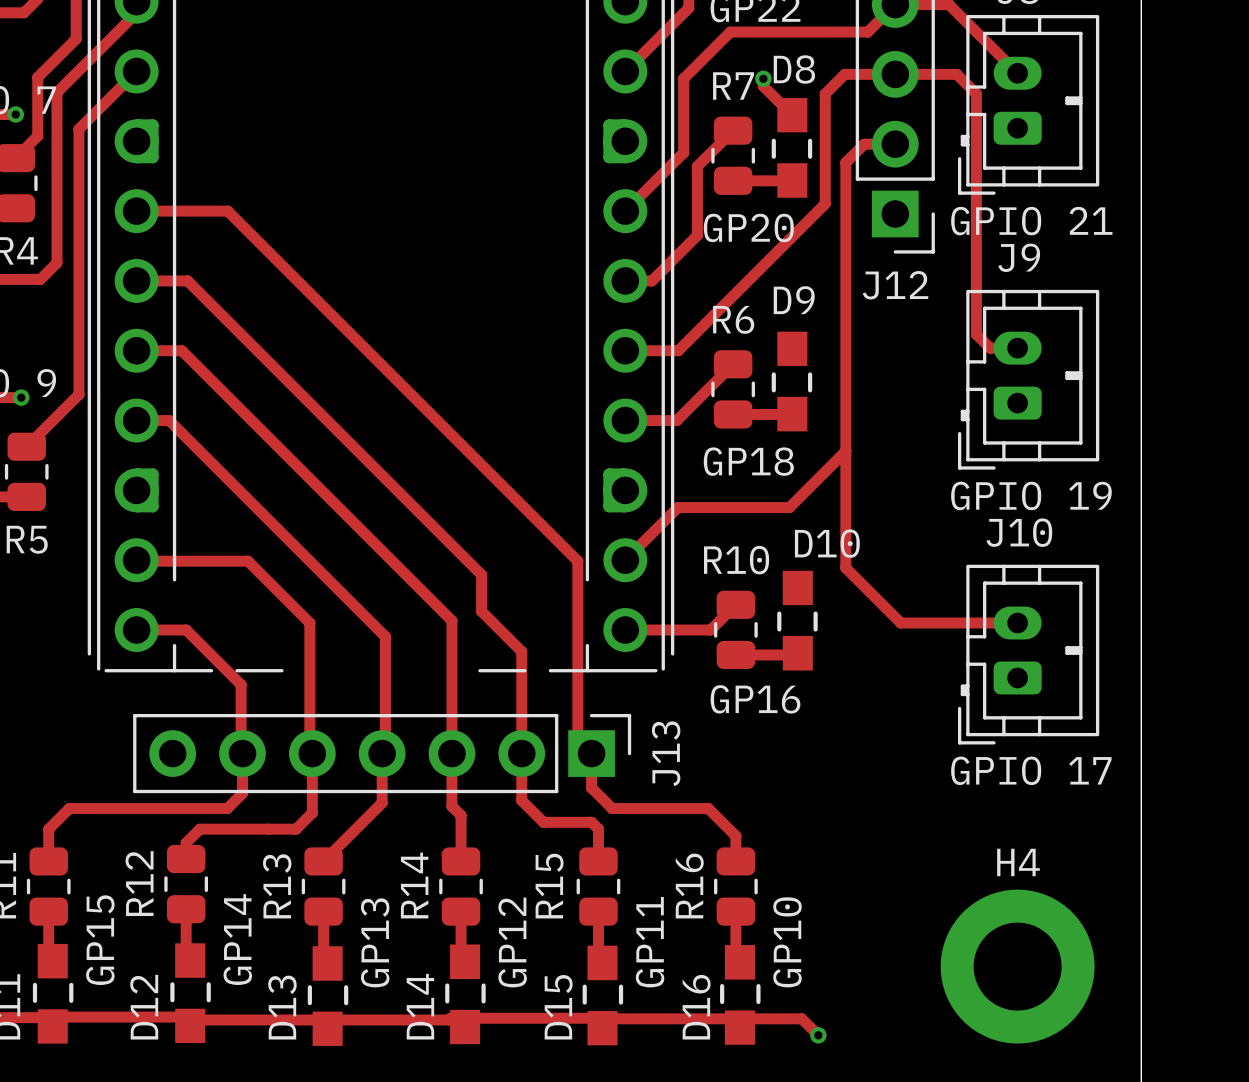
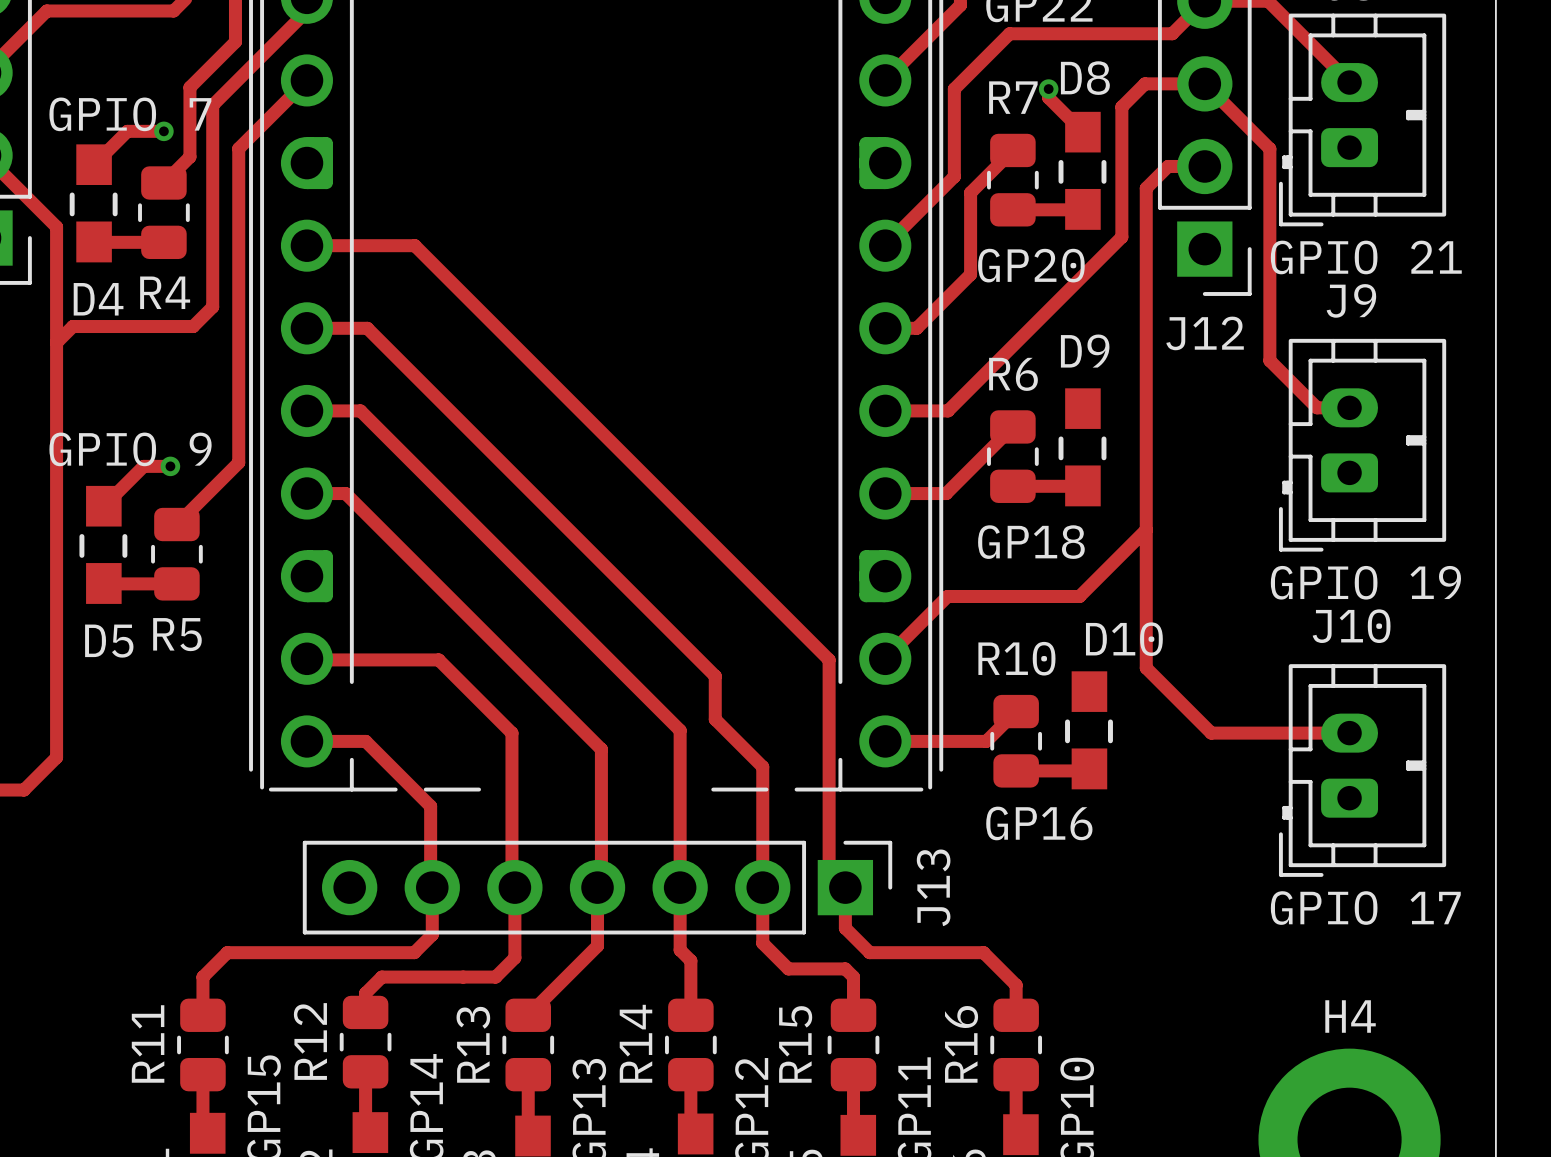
top track: (895, 74) (956, 74) (976, 93) (976, 334) -> (1204, 83) (1269, 148) (1269, 360) (1300, 391)

